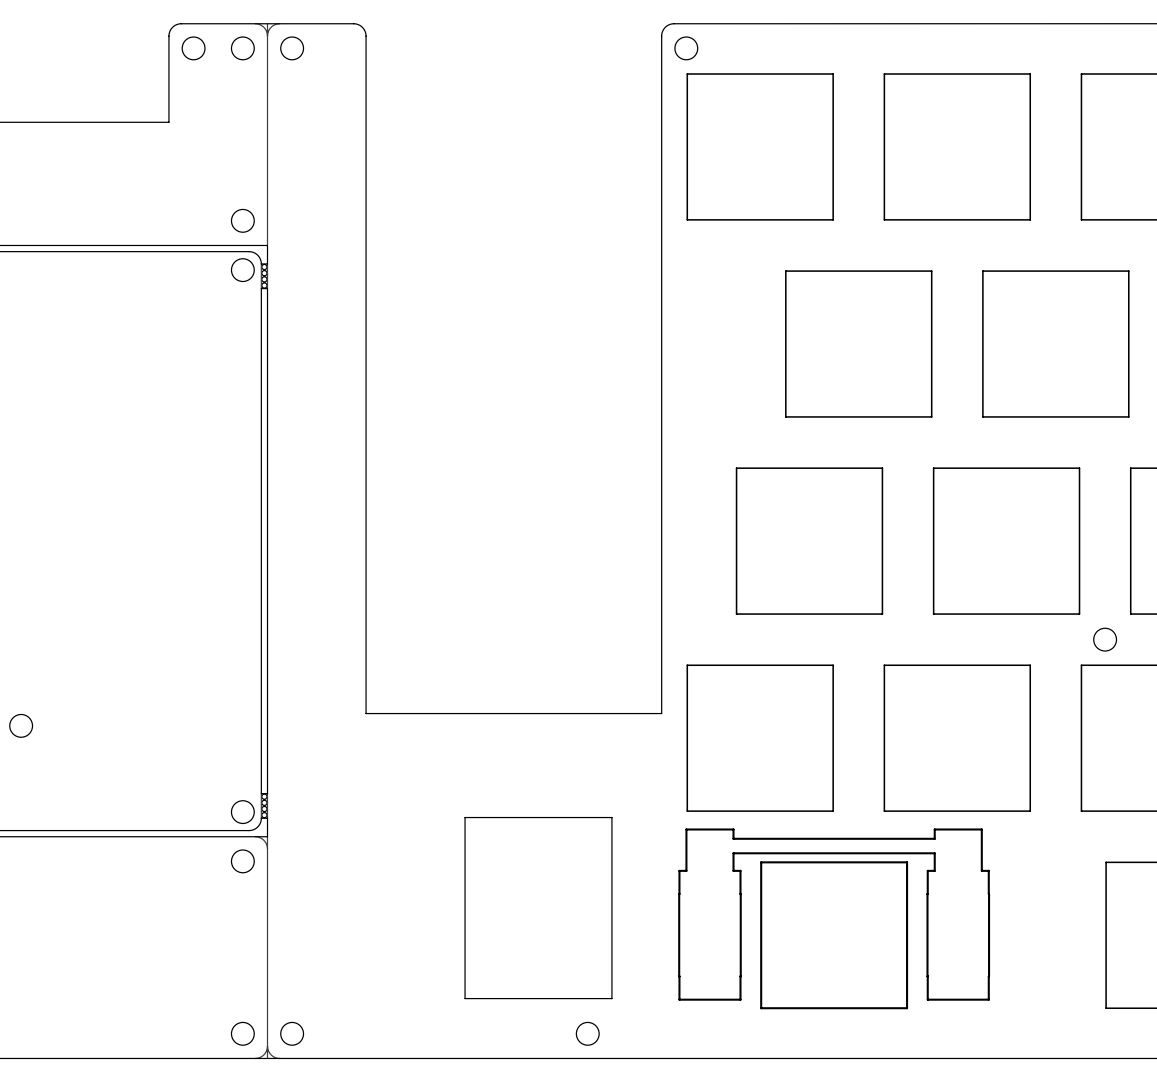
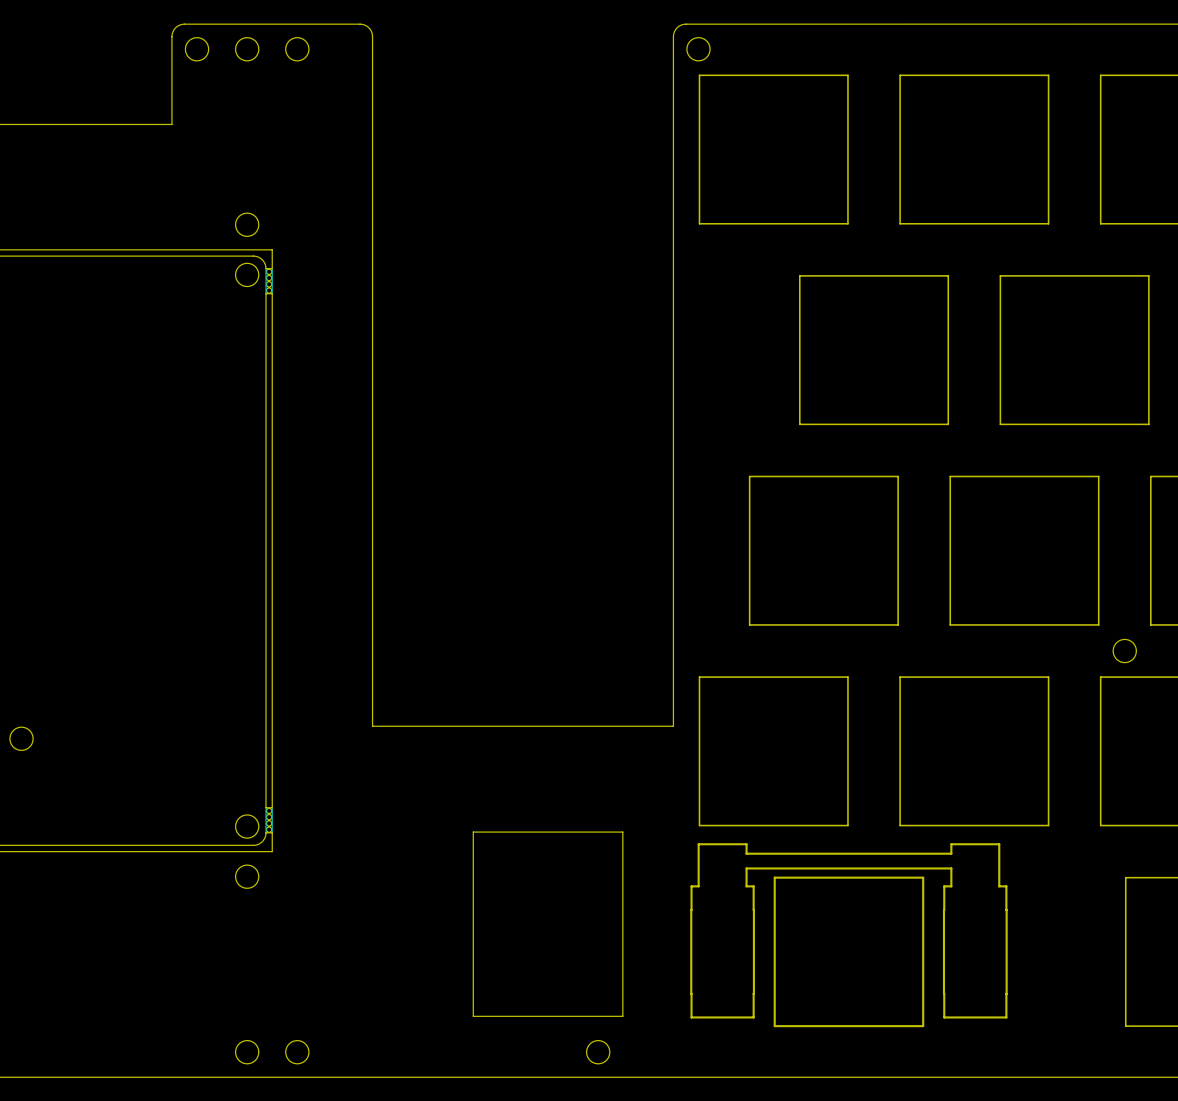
line: (267, 23) (267, 245) -> none
line: (279, 23) (271, 27) (267, 36) (263, 27) (255, 23) -> none
line: (255, 836) (263, 840) (267, 849) -> none
line: (267, 836) (267, 1058) -> none
line: (279, 1058) (271, 1054) (267, 1046) (263, 1054) (255, 1058) -> none

